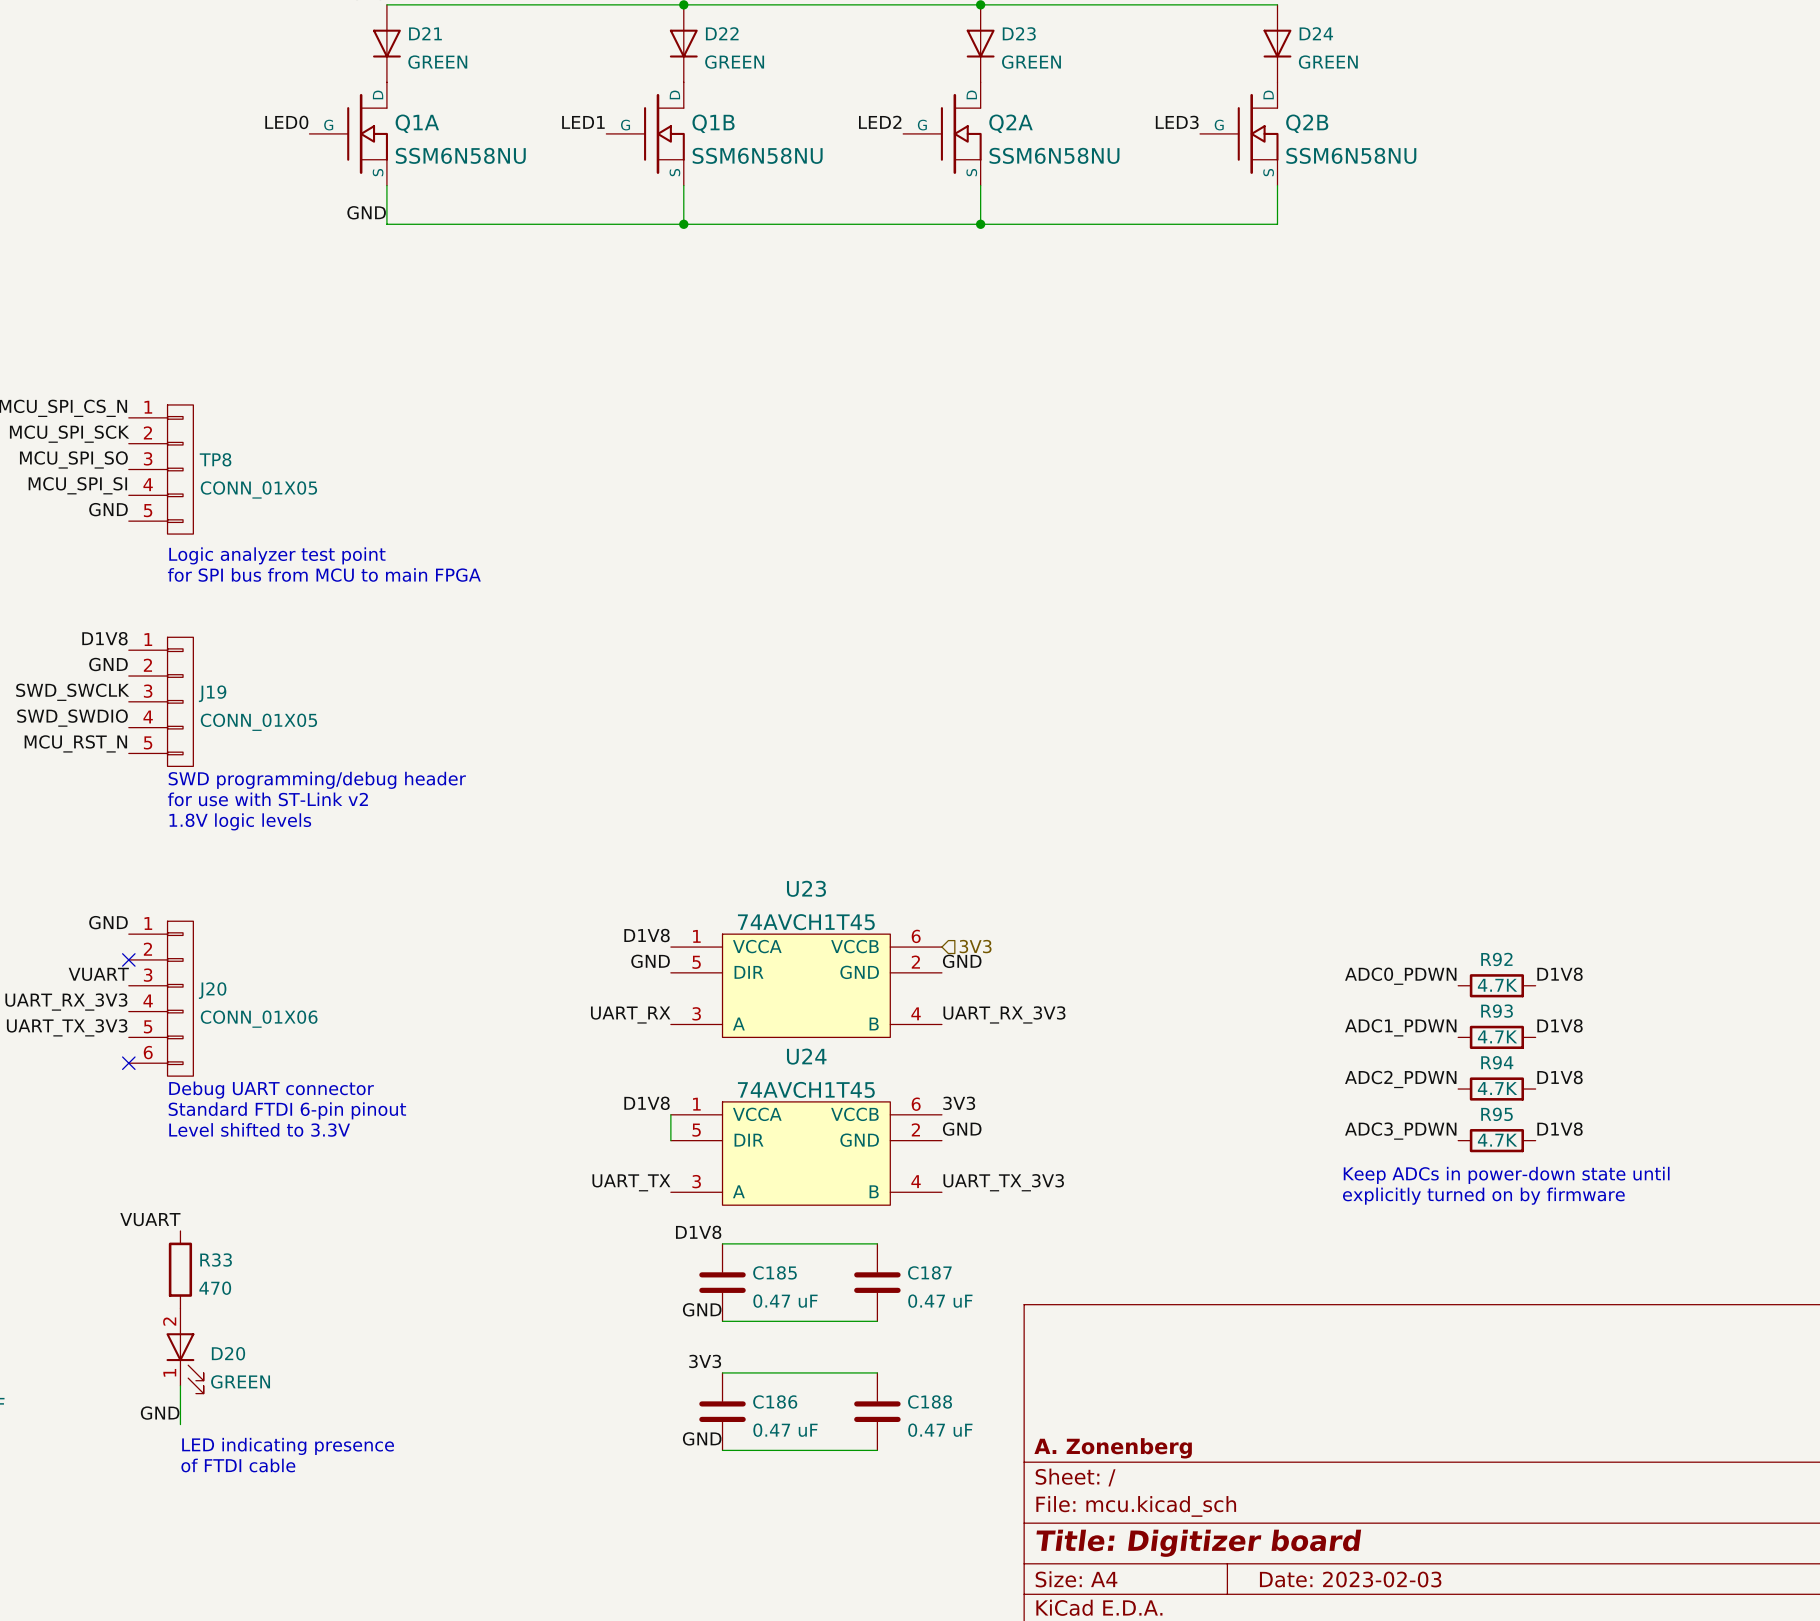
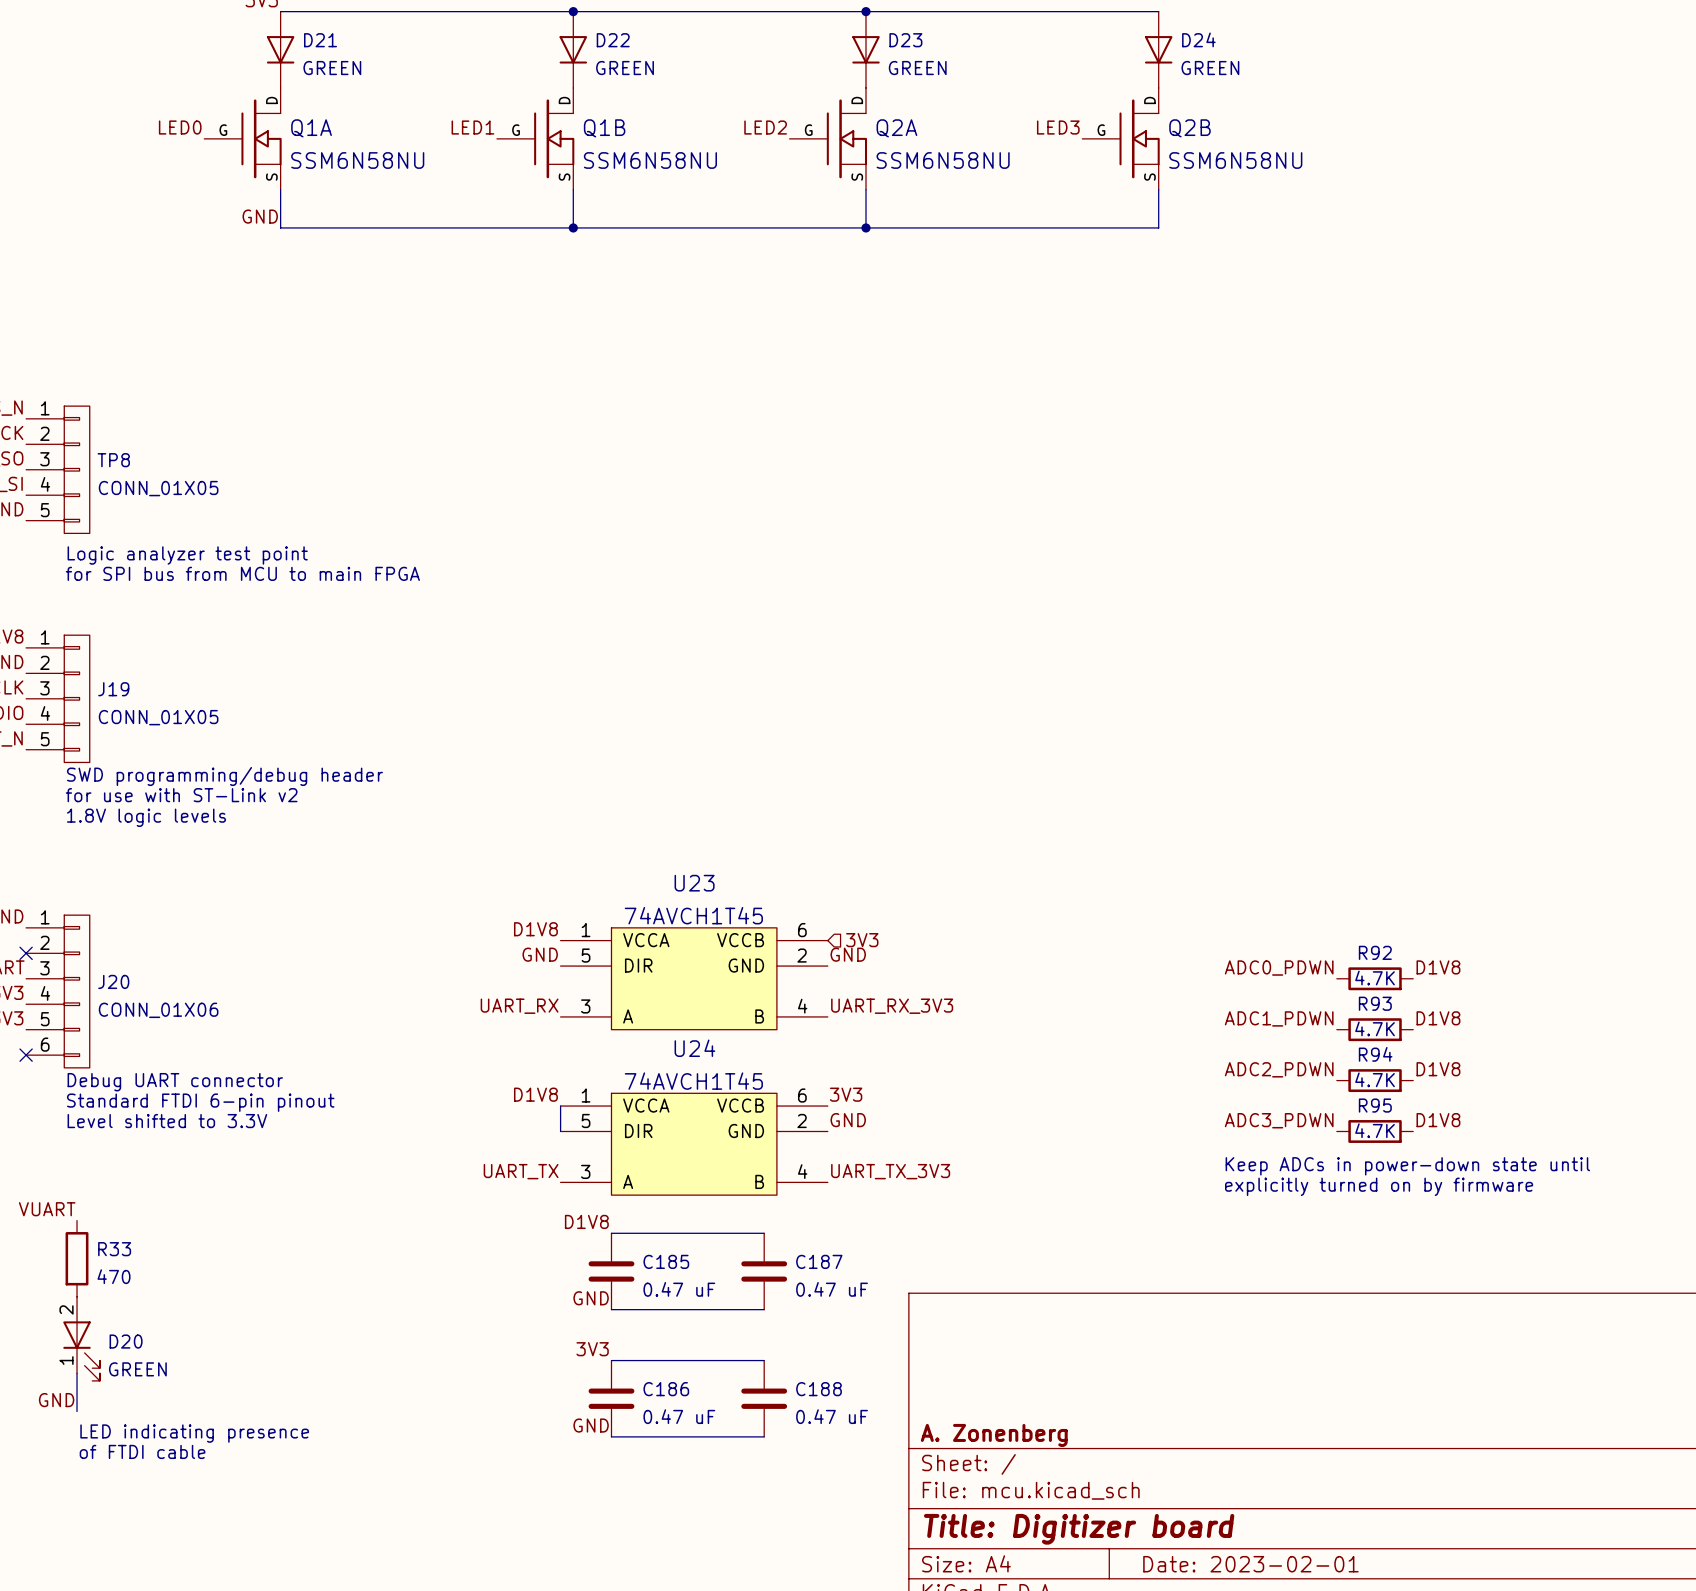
title block: Date: 2023-02-03 (1350, 1579) -> Date: 2023-02-01 (1250, 1564)

